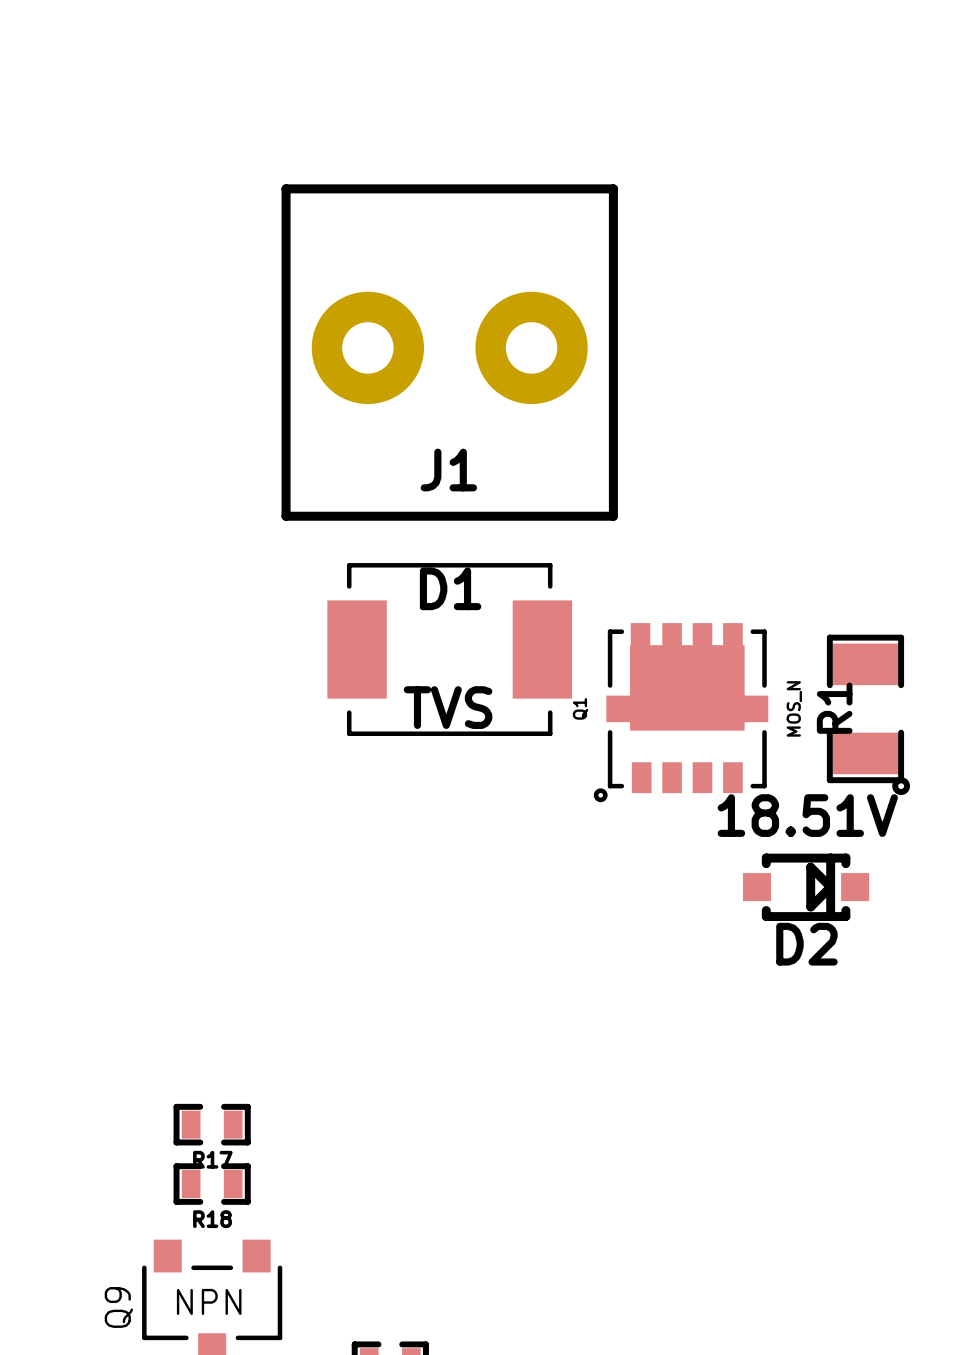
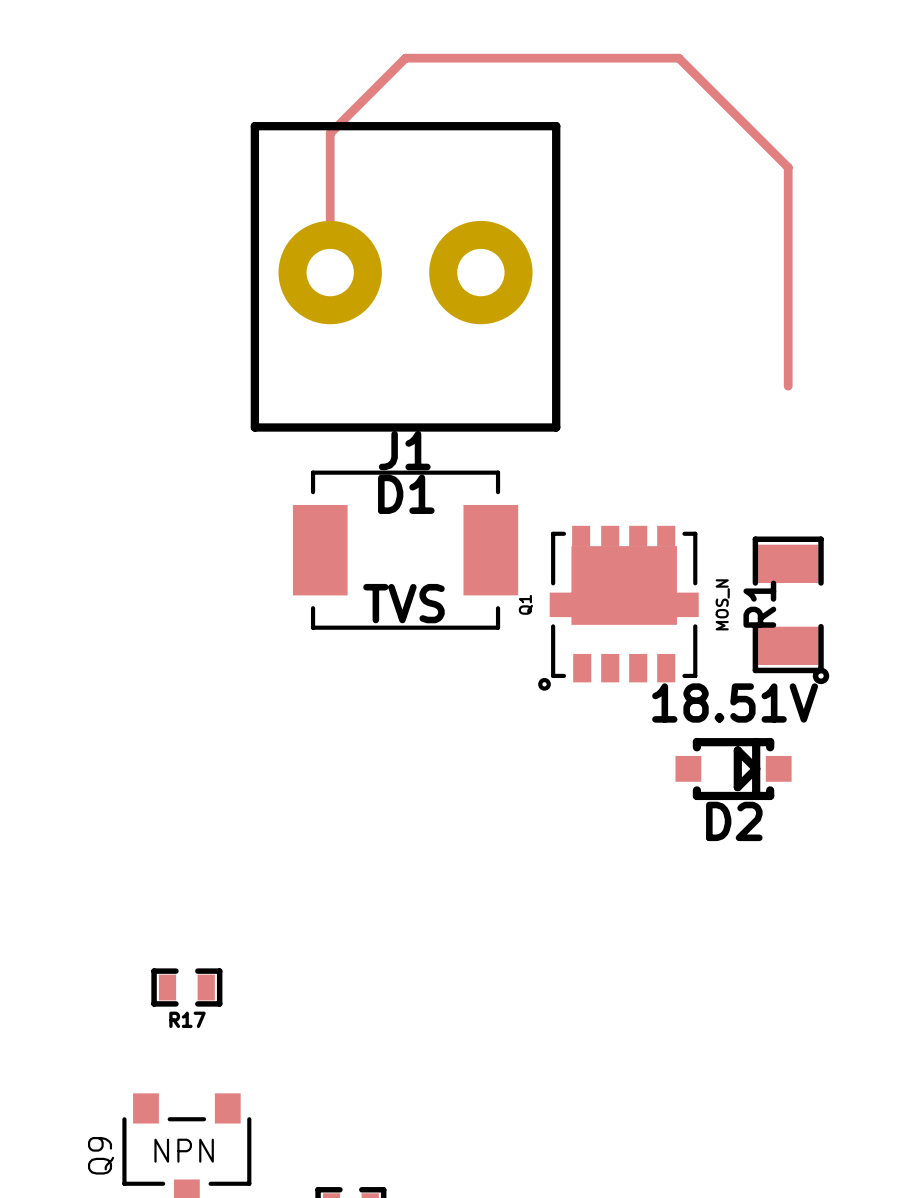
track: none -> (330, 272) (330, 133) (405, 58) (678, 58) (788, 167) (788, 386)
J1 name position: J1 (448, 470) -> J1 (404, 450)
R18: (212, 1184) -> none

